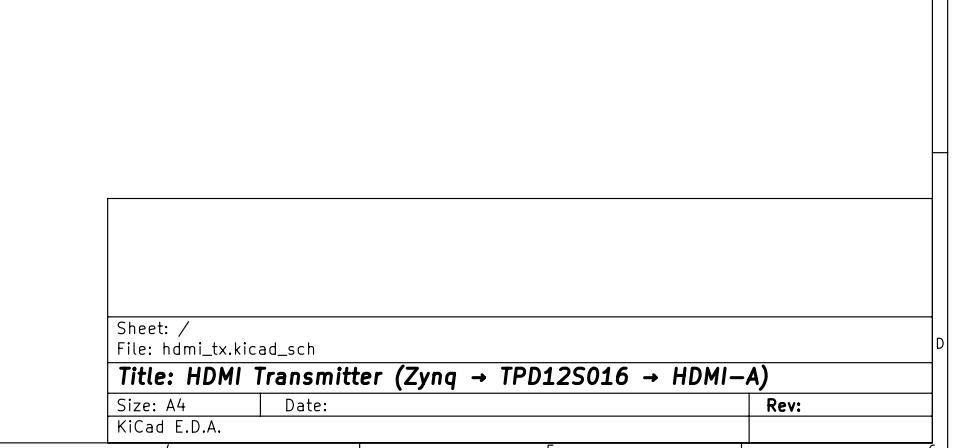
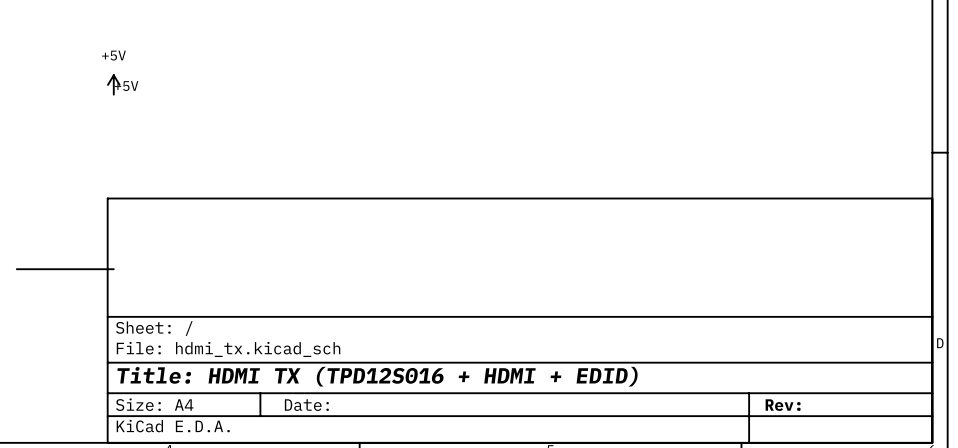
power symbol: none -> +5V (113, 84)
label: none -> +5V (126, 86)
wire: none -> (16, 269) (113, 269)
title block: Title: HDMI Transmitter (Zynq → TPD12S016 → HDMI-A) (443, 377) -> Title: HDMI TX (TPD12S016 + HDMI + EDID) (377, 376)

